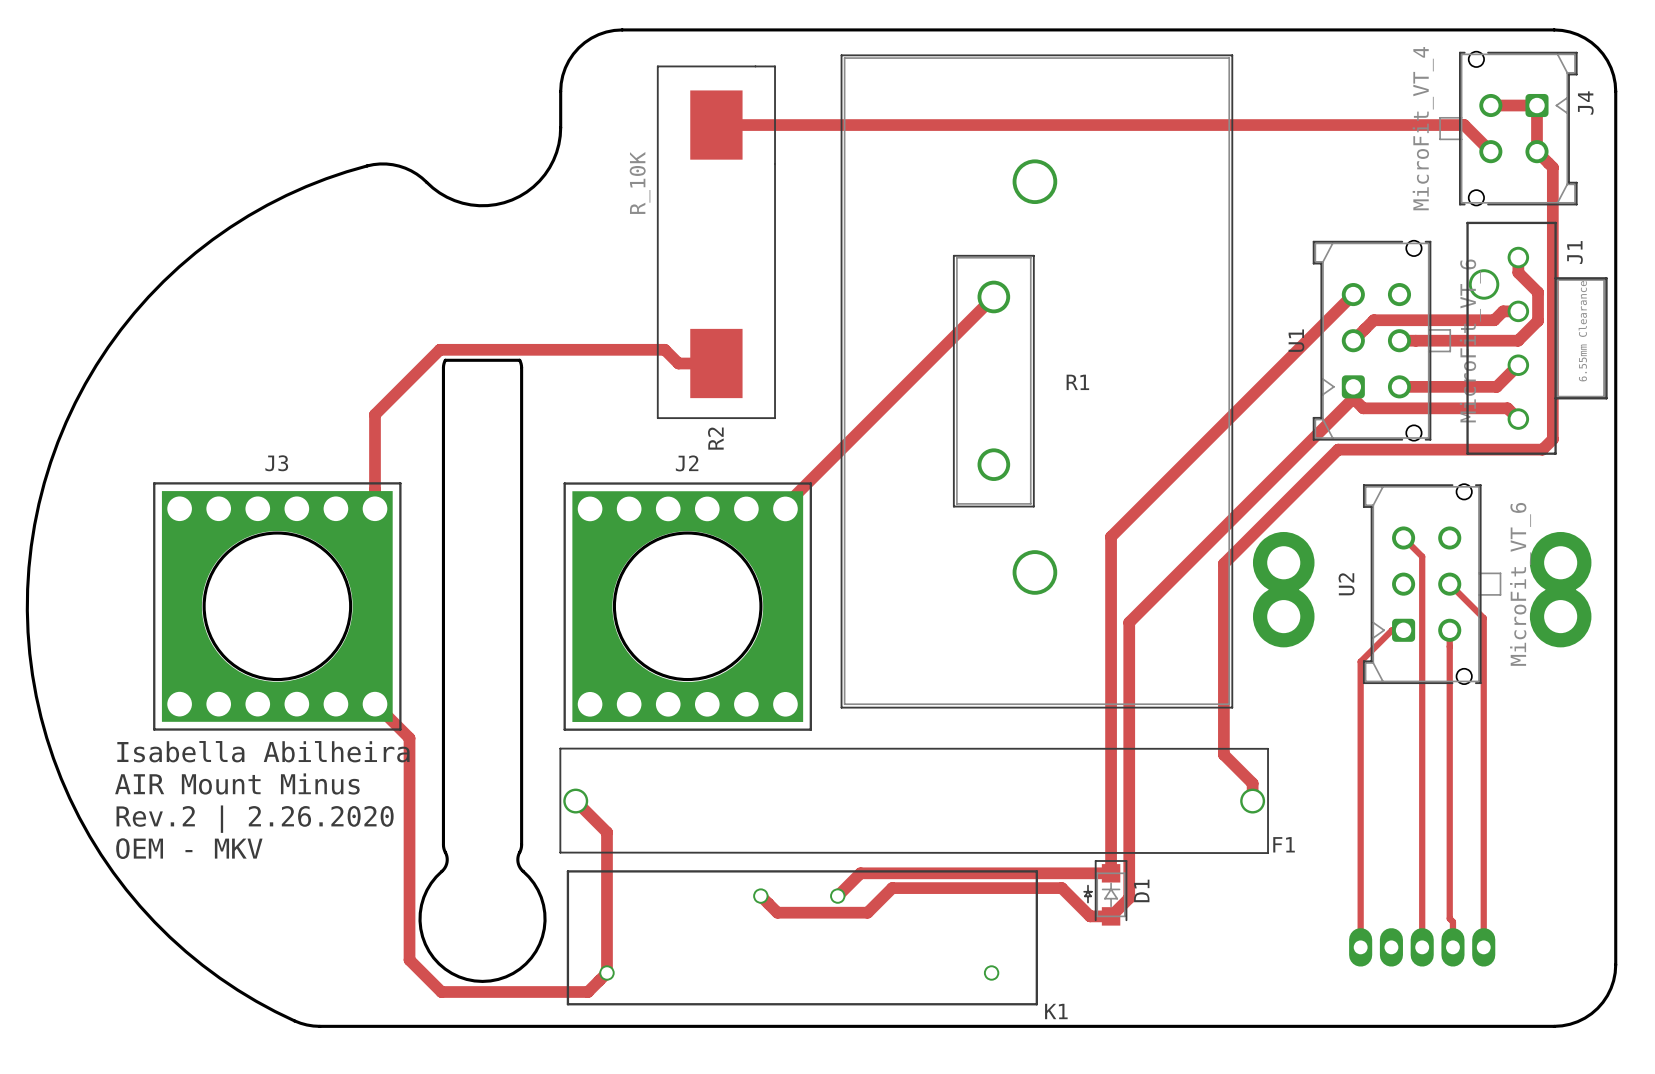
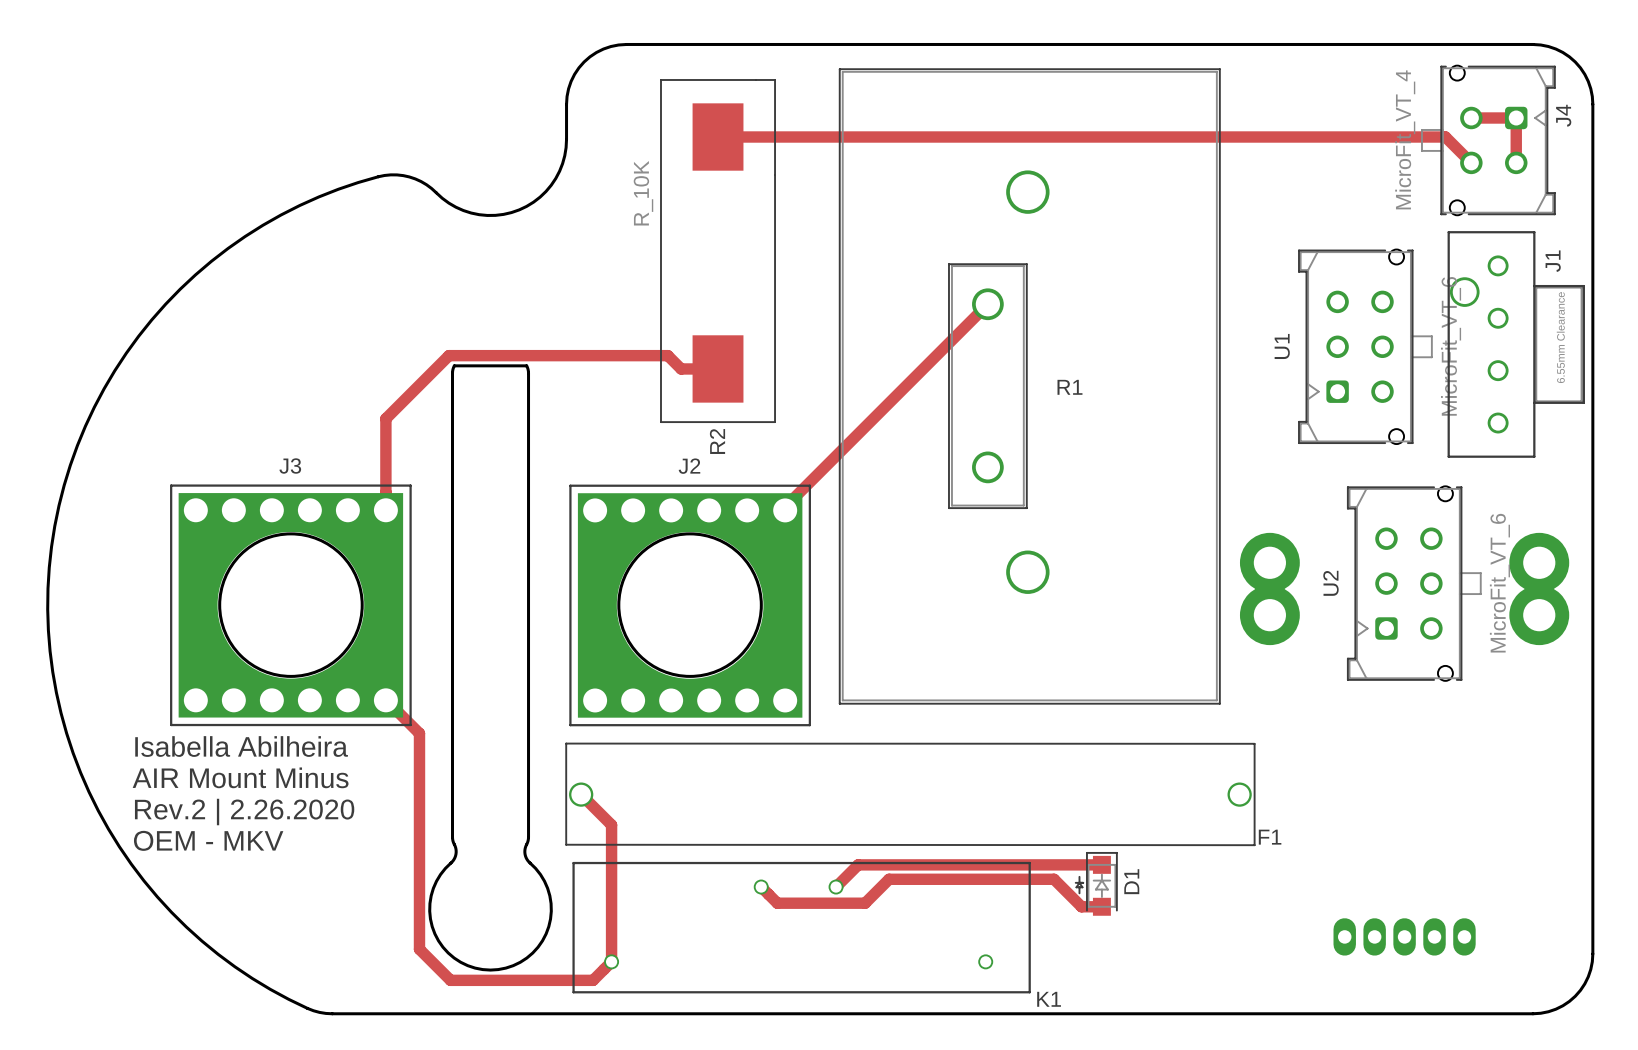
track: (1536, 151) (1552, 167) (1552, 439) (1542, 449) (1338, 449) (1223, 563) (1223, 754) (1252, 783) (1252, 801) -> none
track: (1518, 257) (1518, 272) (1538, 292) (1538, 320) (1518, 340) (1399, 340) -> none
track: (1353, 294) (1111, 536) (1111, 873) -> none
track: (1518, 311) (1503, 311) (1494, 320) (1373, 320) (1353, 340) -> none
track: (1518, 365) (1496, 386) (1399, 386) -> none
track: (1353, 398) (1129, 622) (1129, 898) (1111, 916) -> none
track: (1353, 398) (1363, 408) (1507, 408) (1518, 419) -> none
track: (1403, 537) (1422, 556) (1422, 947) -> none
track: (1449, 584) (1483, 618) (1483, 947) -> none
track: (1403, 630) (1392, 630) (1360, 661) (1360, 947) -> none
track: (1449, 630) (1449, 918) (1452, 921) (1452, 947) -> none

